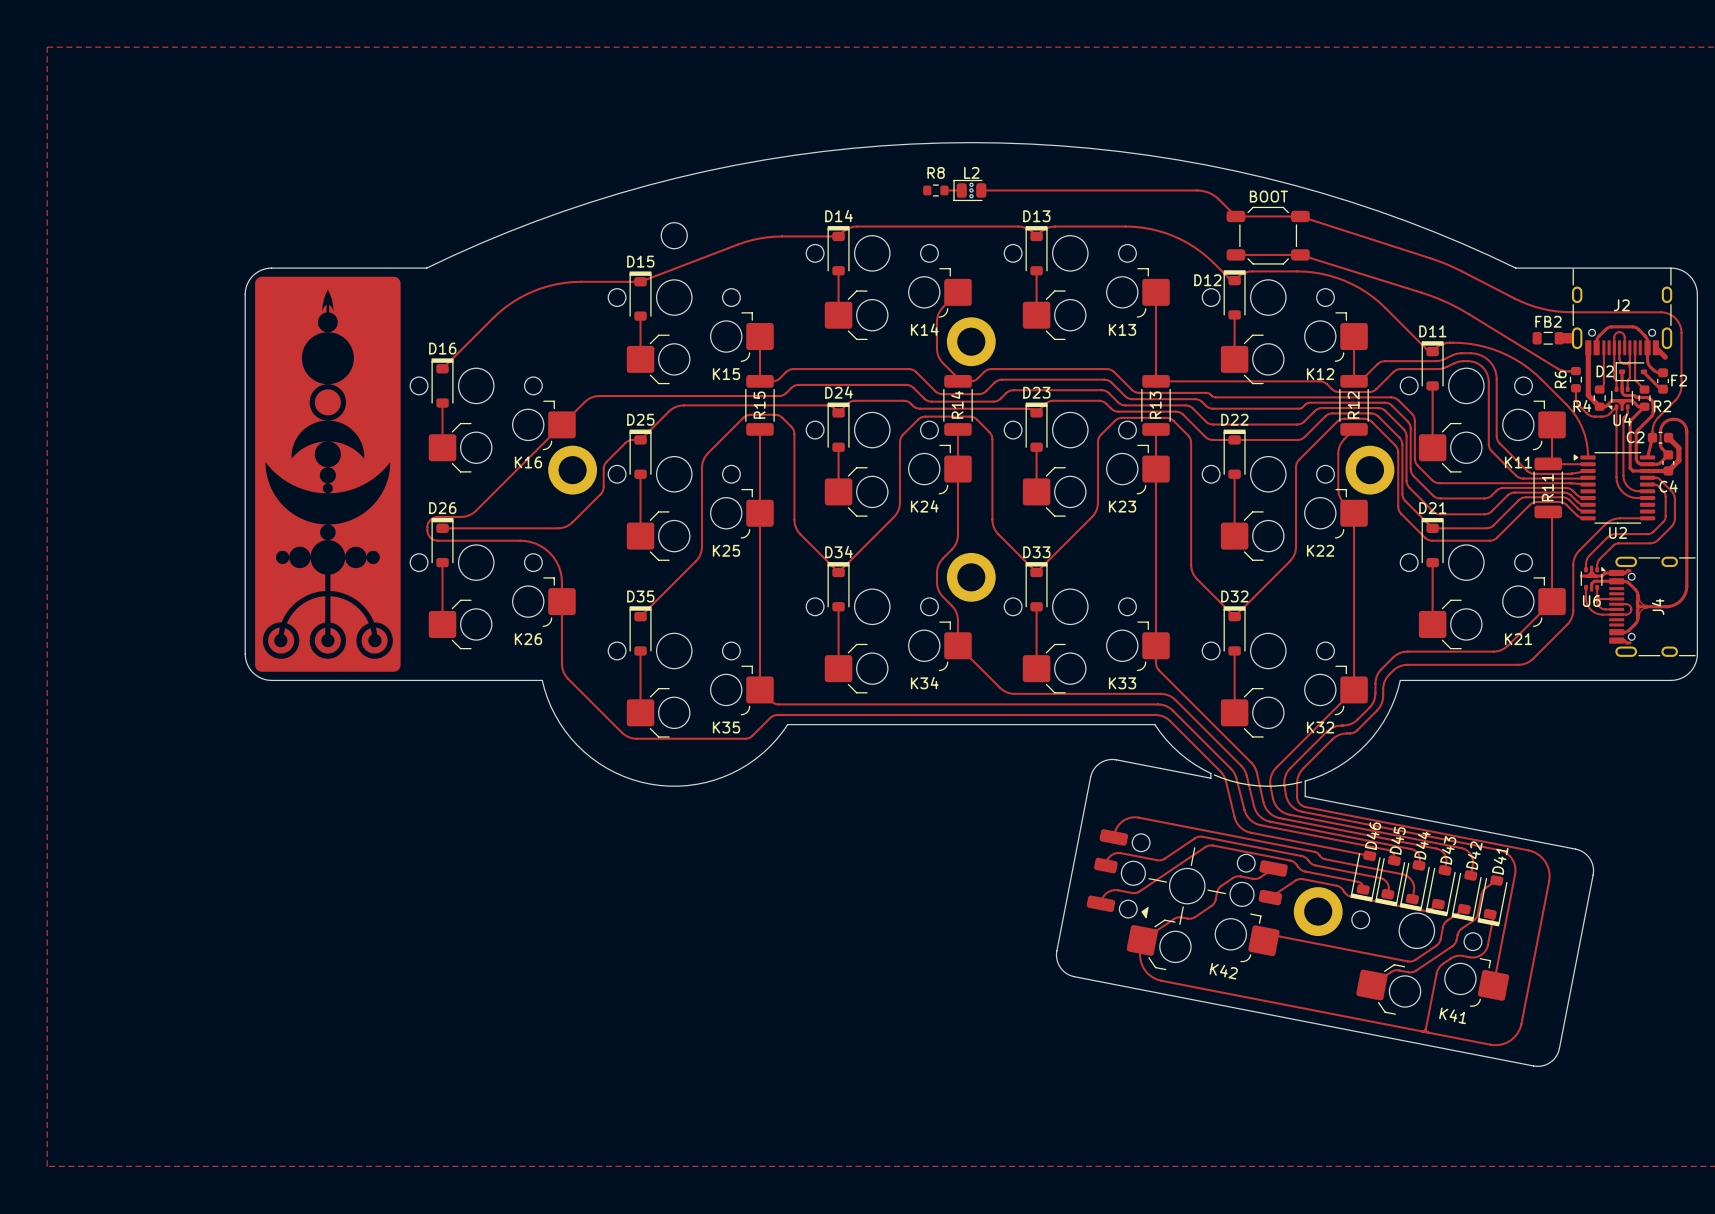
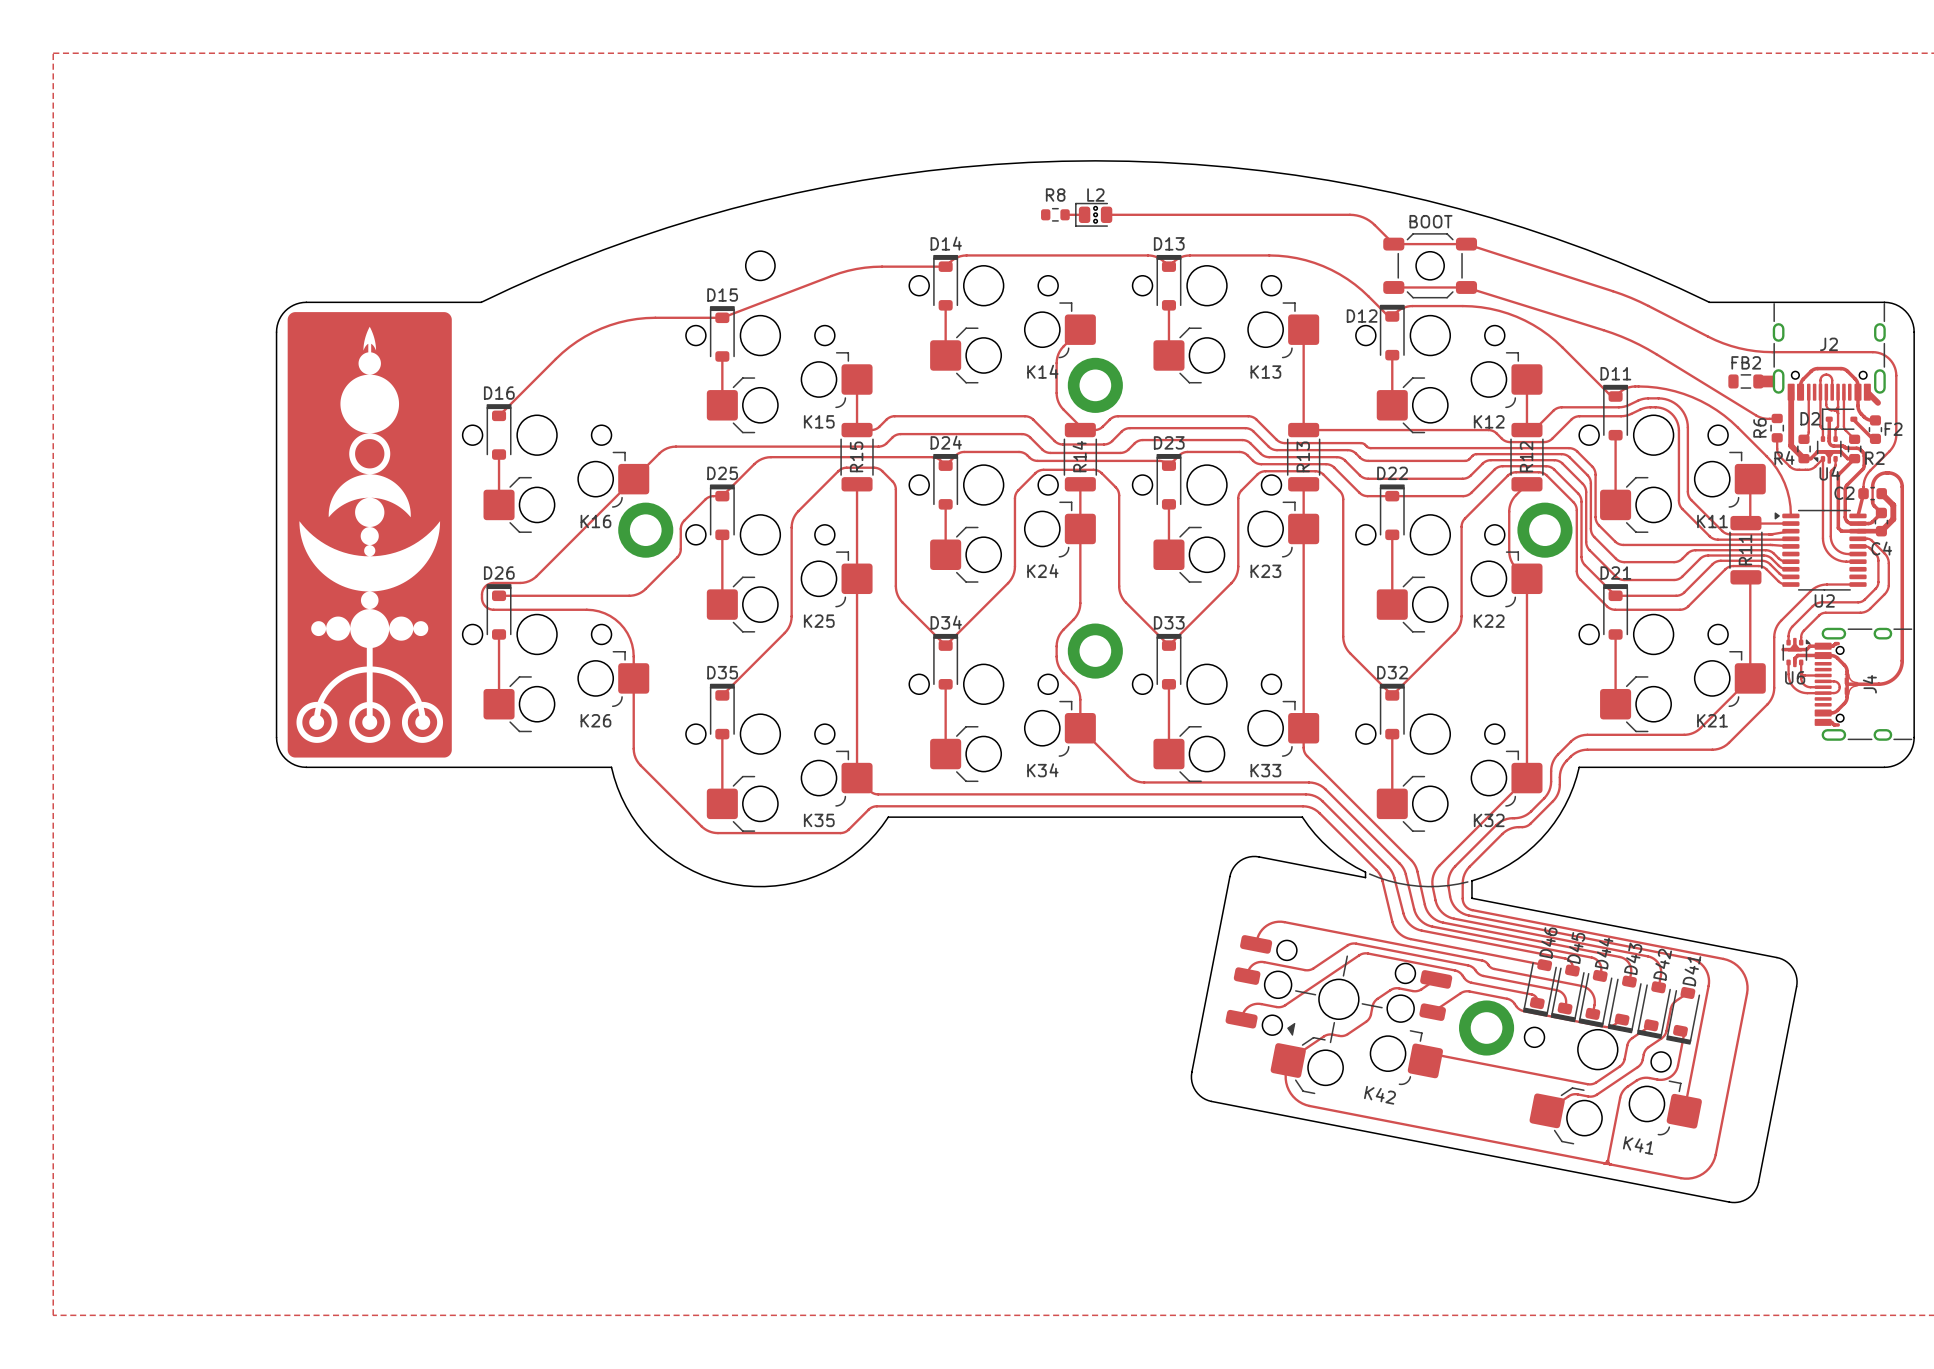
part footprint: [1226, 206, 1310, 265] -> [1383, 233, 1478, 299]

